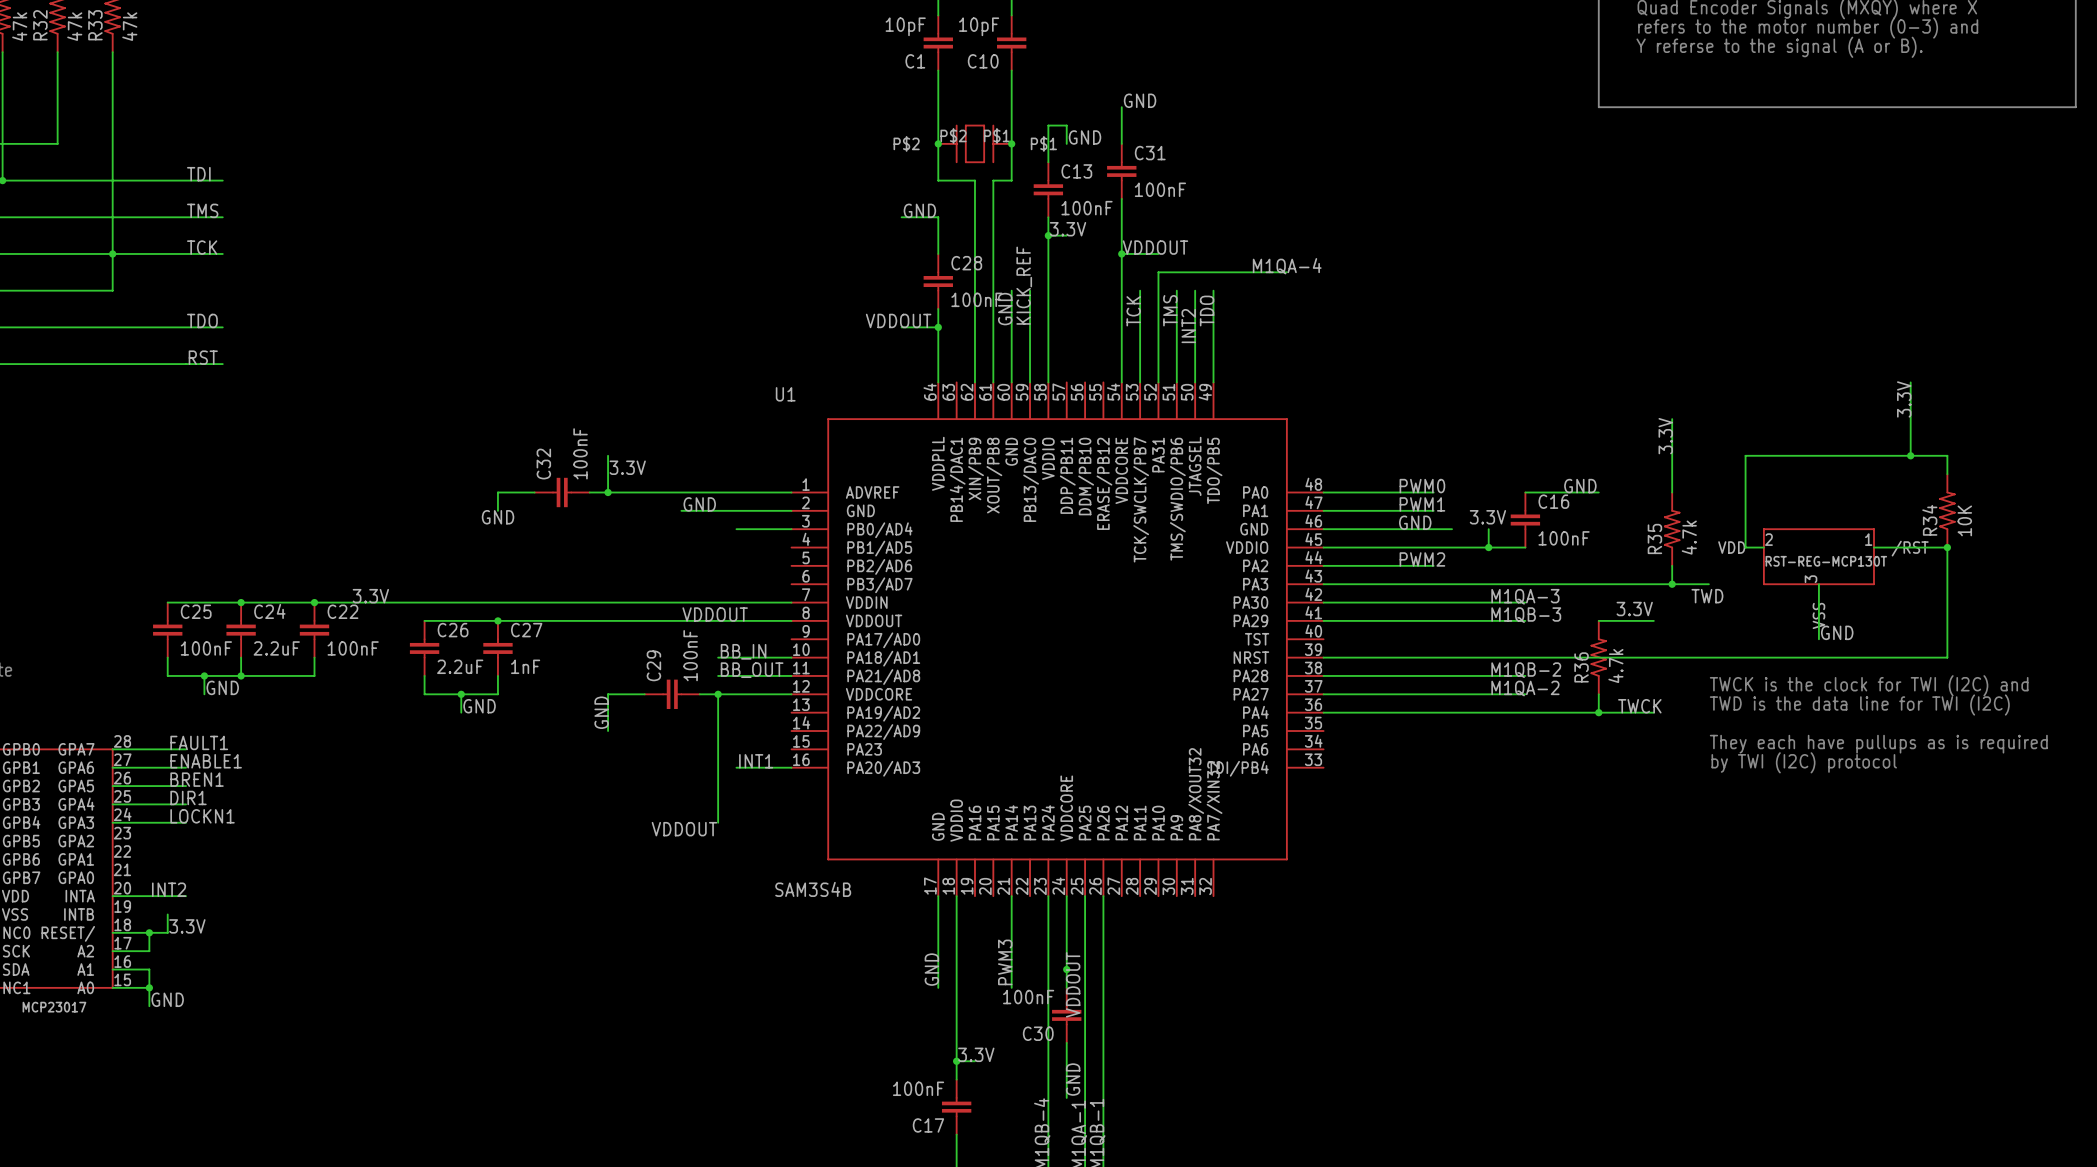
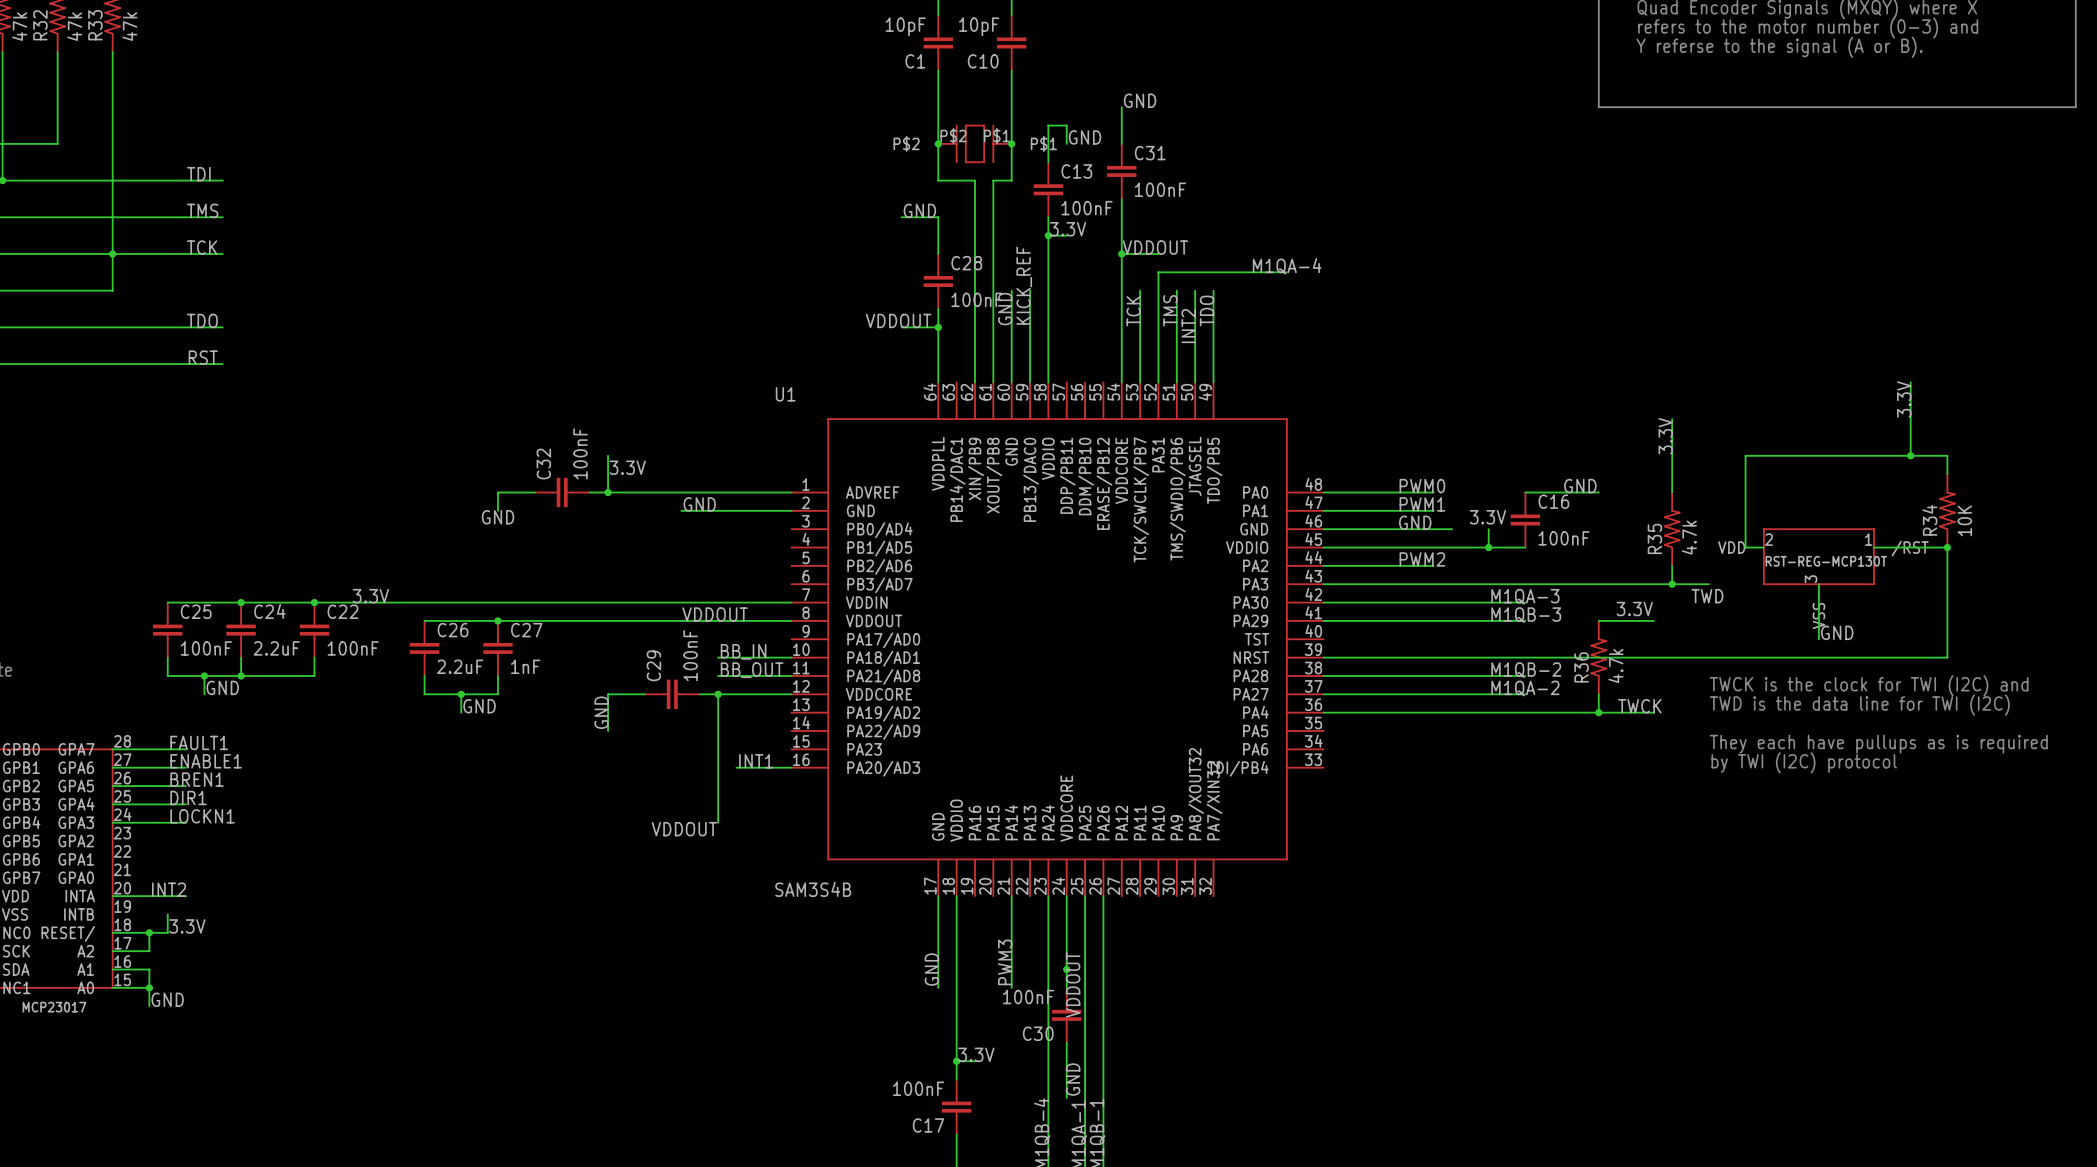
wire: (736, 529) (791, 529) -> none

